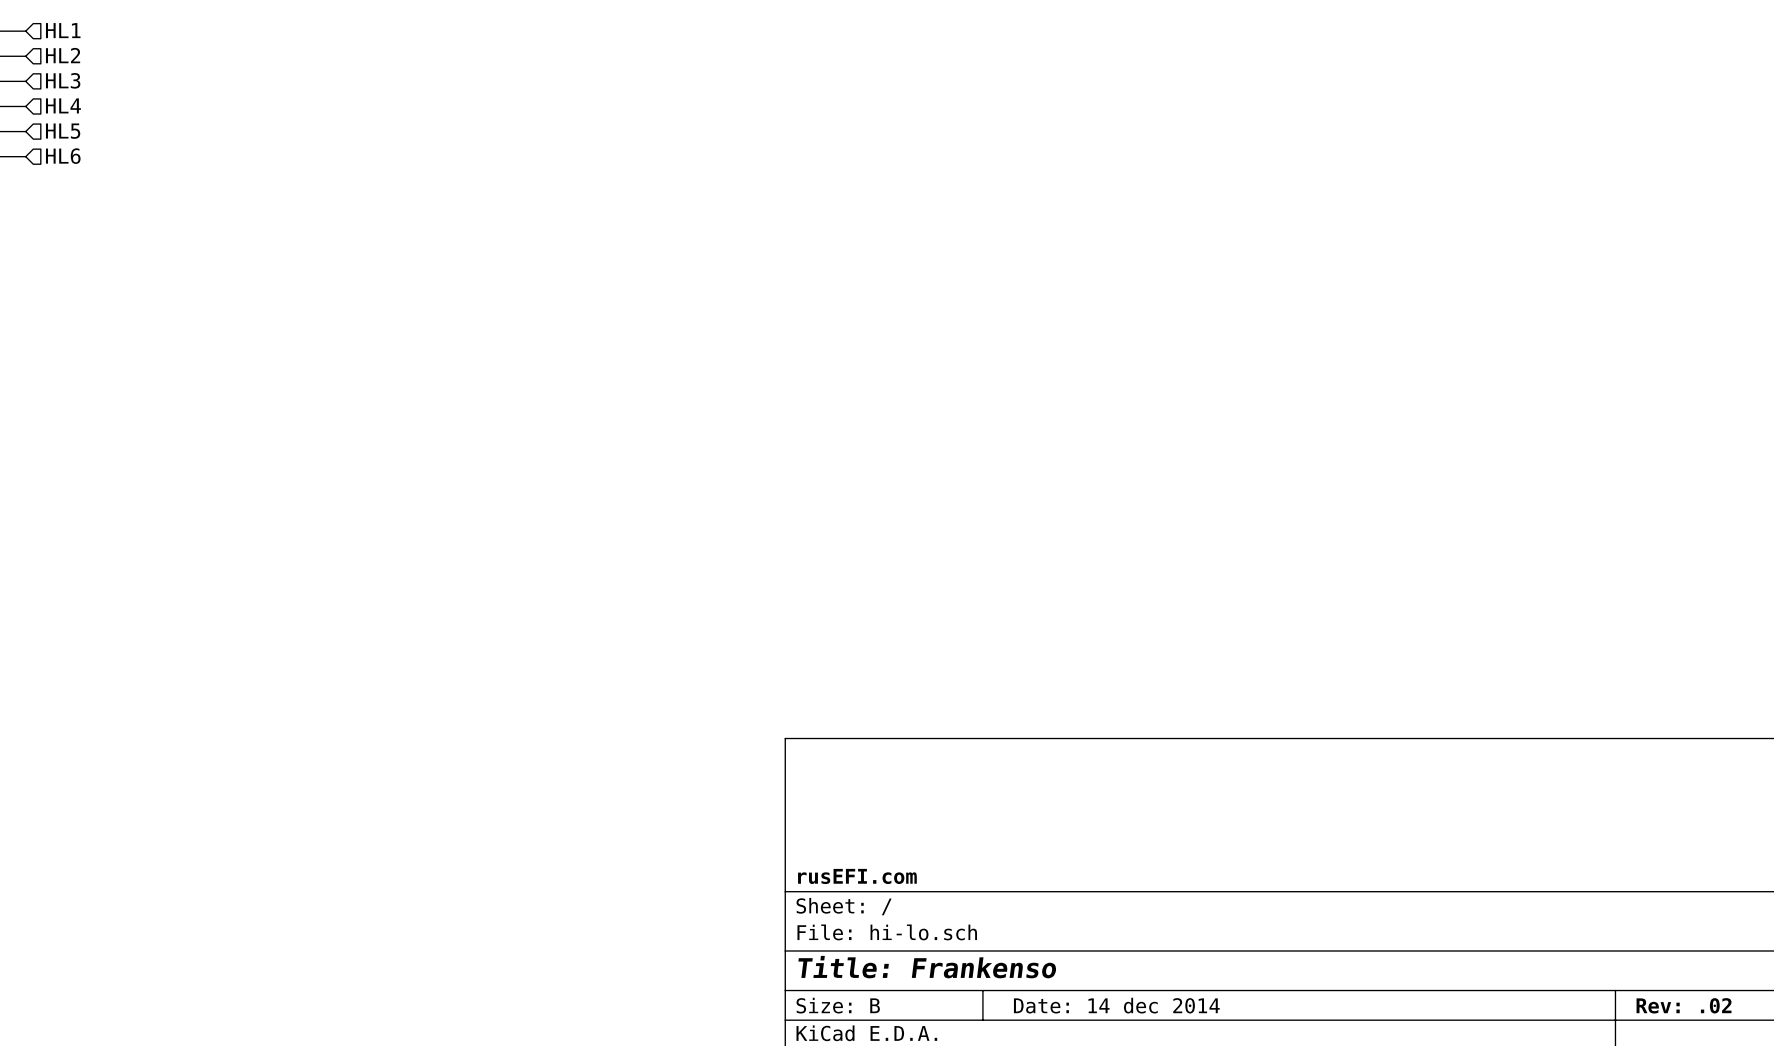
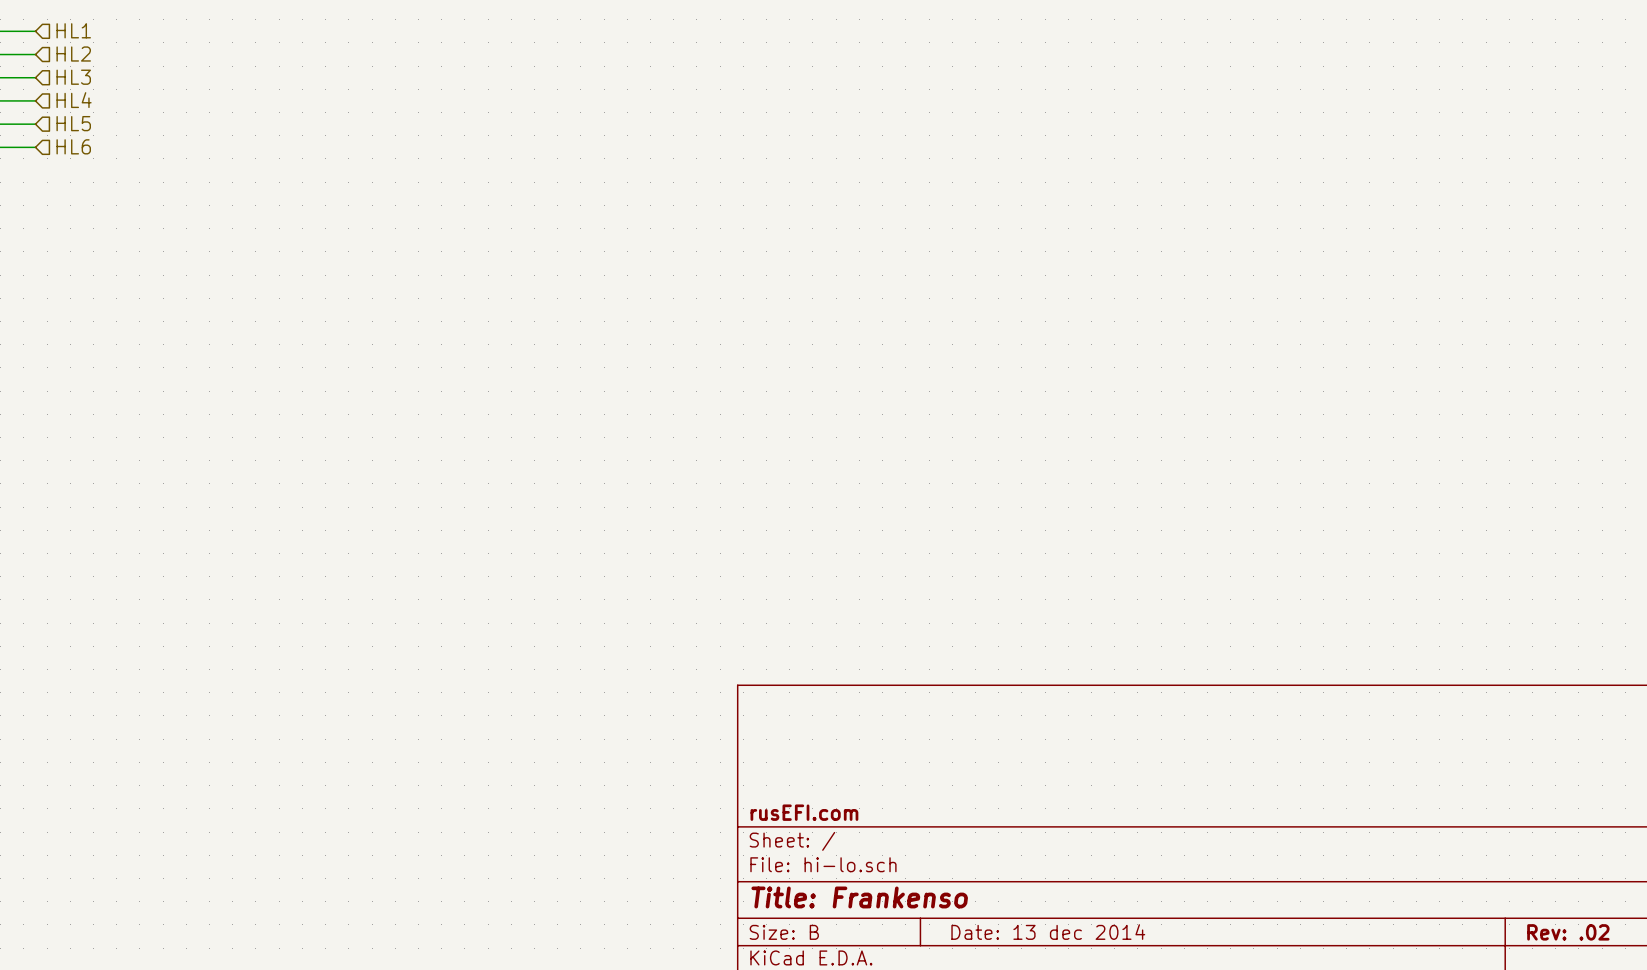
title block: Date: 14 dec 2014 (1116, 1005) -> Date: 13 dec 2014 (1048, 932)

